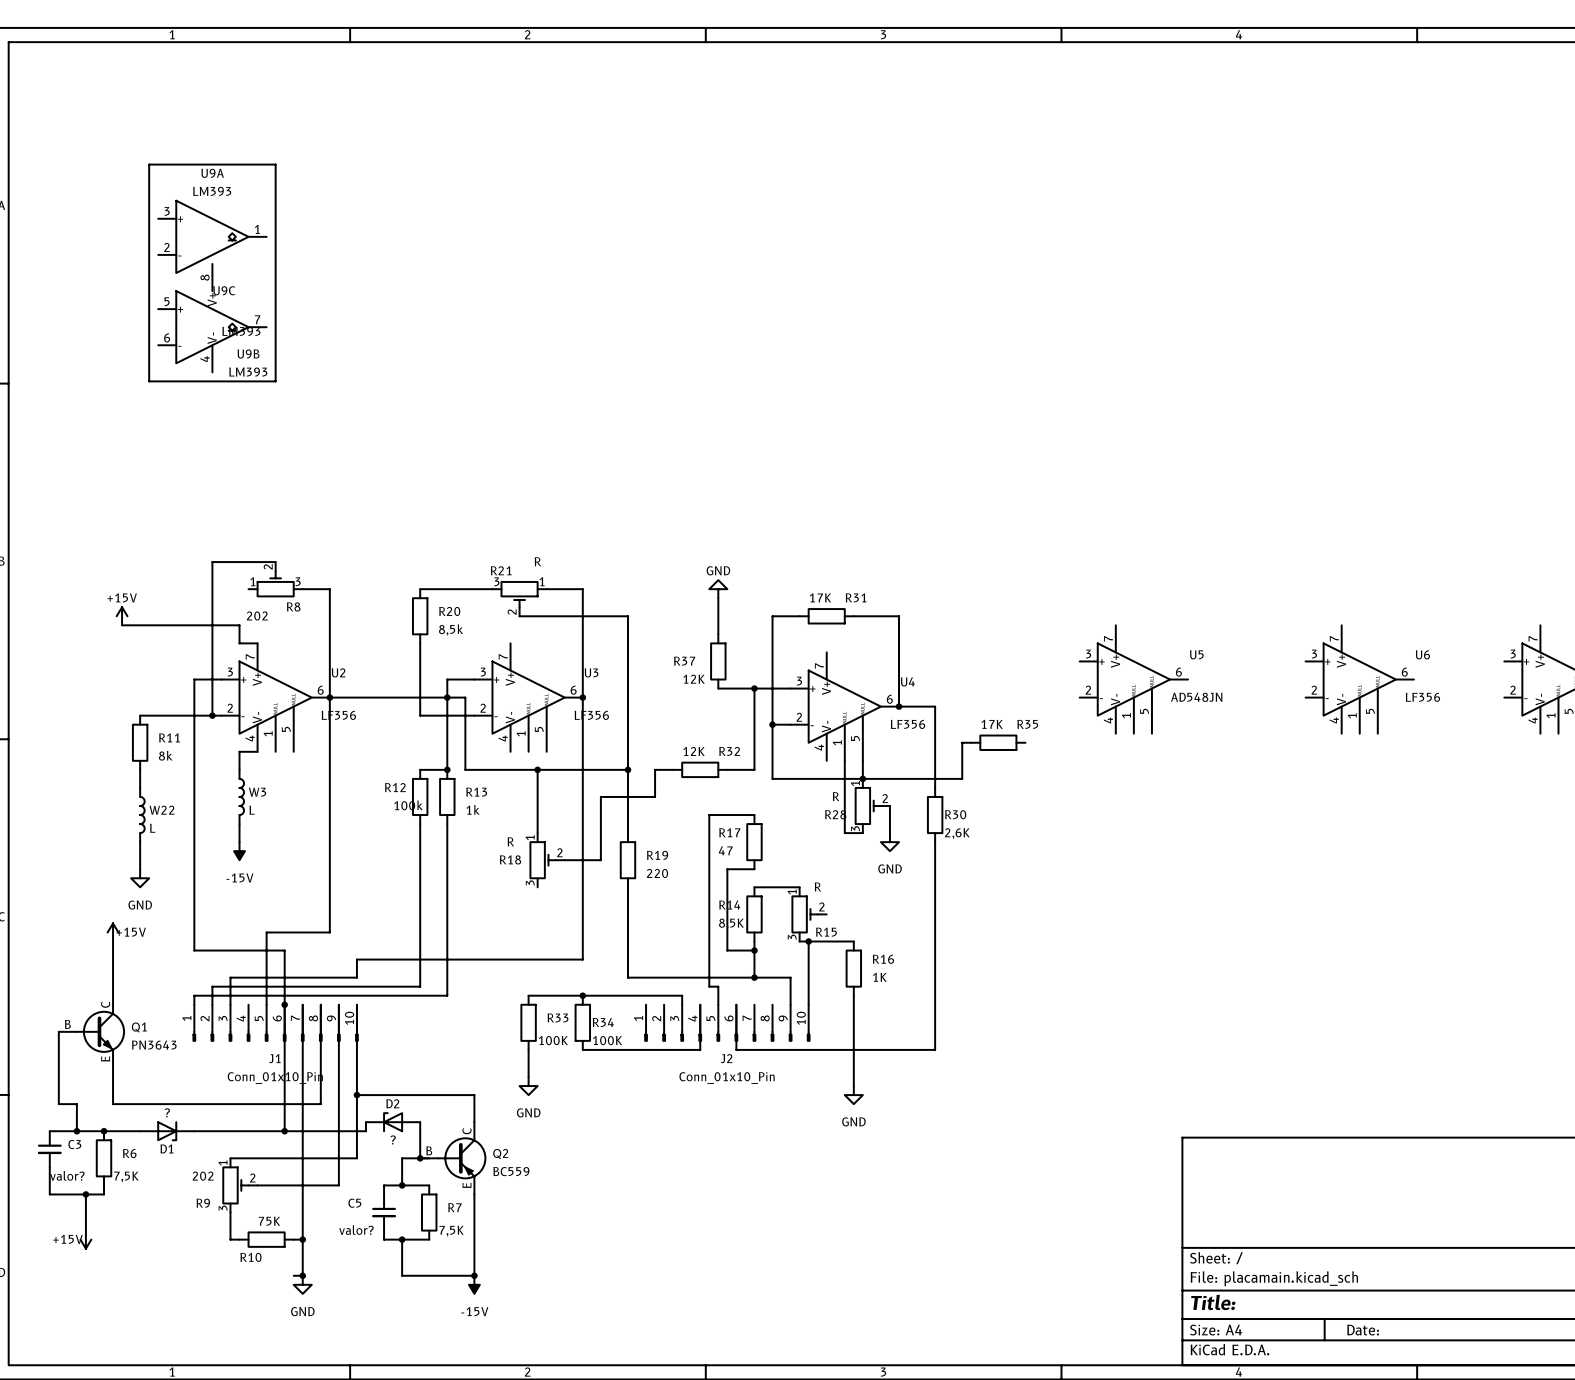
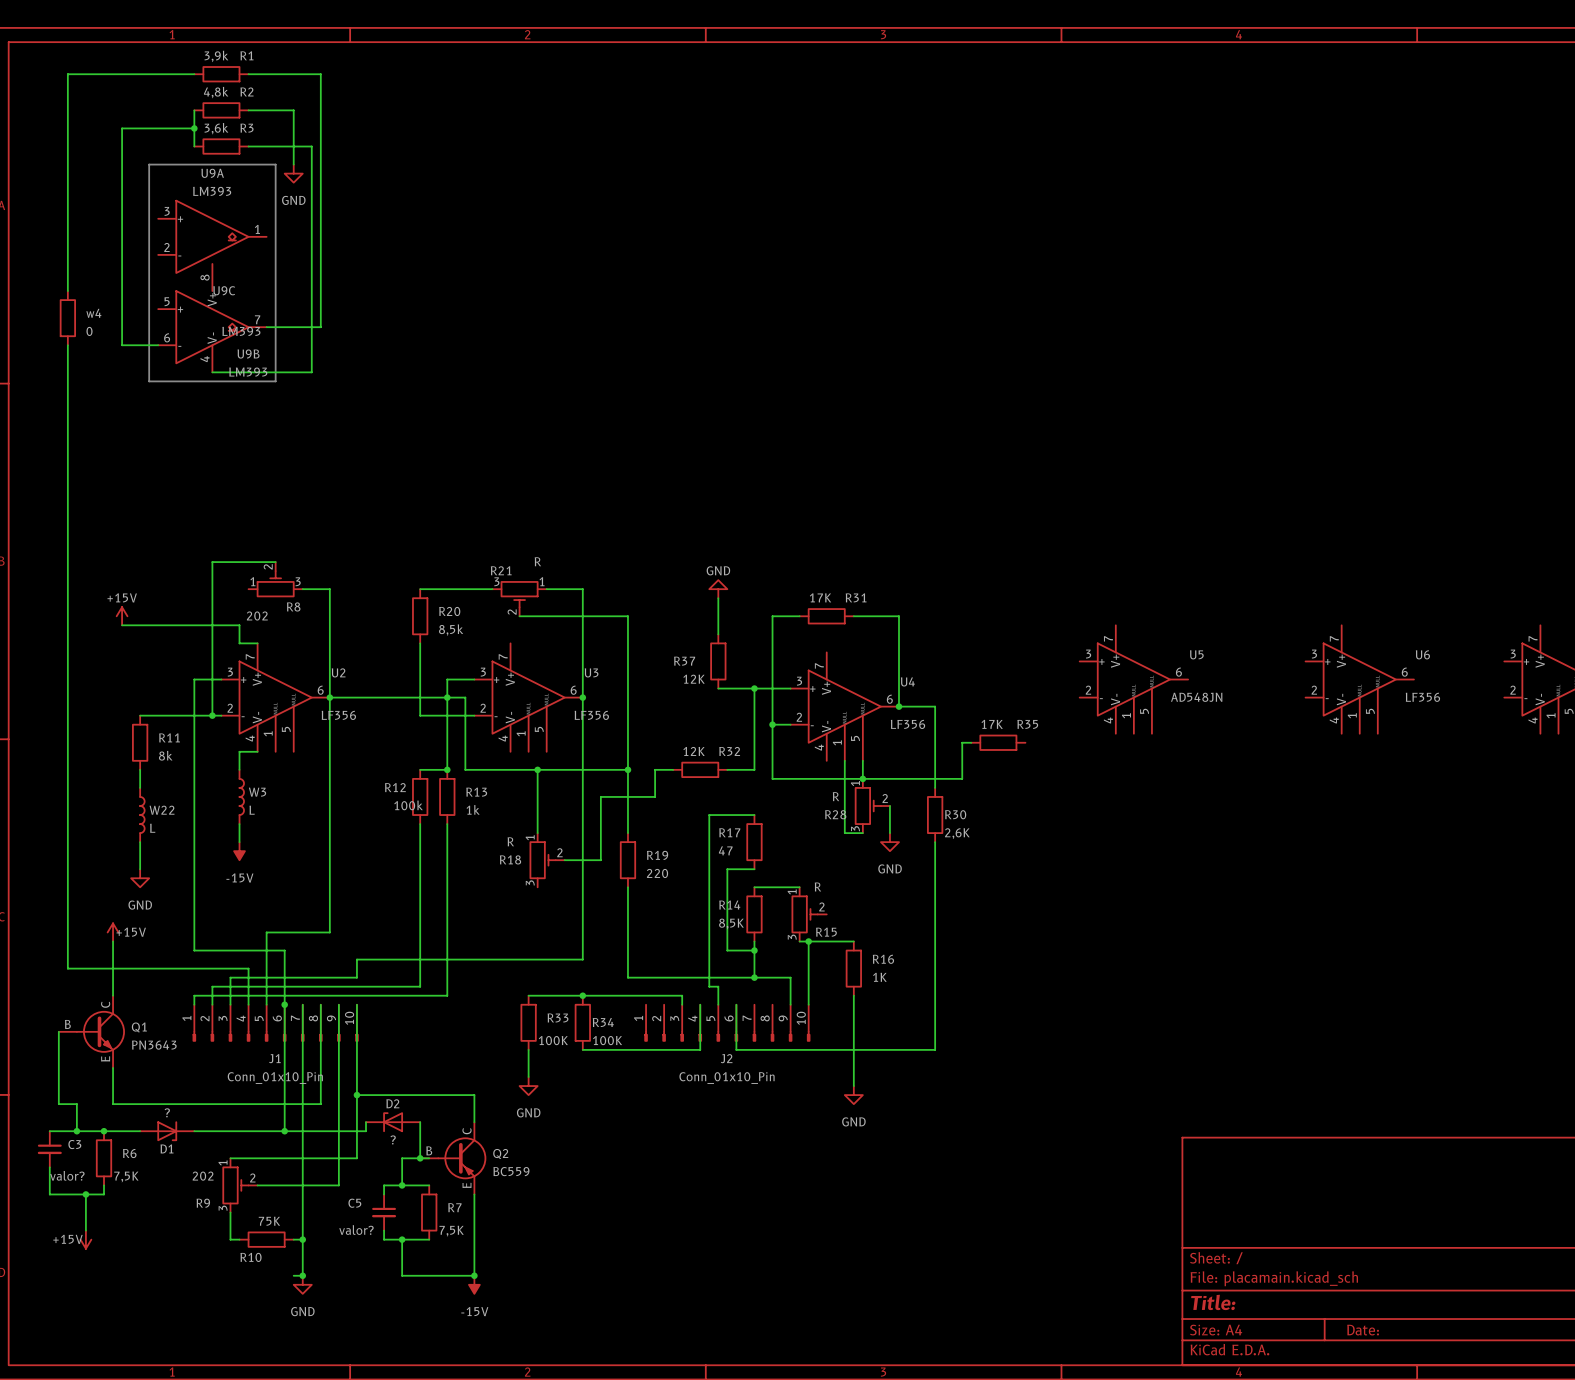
wire: none -> (194, 74) (67, 74) (67, 291)
R1: none -> 3,9k (221, 74)
wire: none -> (248, 74) (320, 74) (320, 327) (266, 327)
wire: none -> (194, 110) (194, 146)
R2: none -> 4,8k (221, 110)
wire: none -> (248, 110) (293, 110) (293, 164)
wire: none -> (194, 128) (122, 128) (122, 345) (158, 345)
junction: none -> (194, 128)
R3: none -> 3,6k (221, 146)
wire: none -> (248, 146) (311, 146) (311, 372) (212, 372)
power symbol: none -> GND (293, 173)
w4: none -> 0 (67, 318)
wire: none -> (67, 345) (67, 968) (248, 968) (248, 1004)

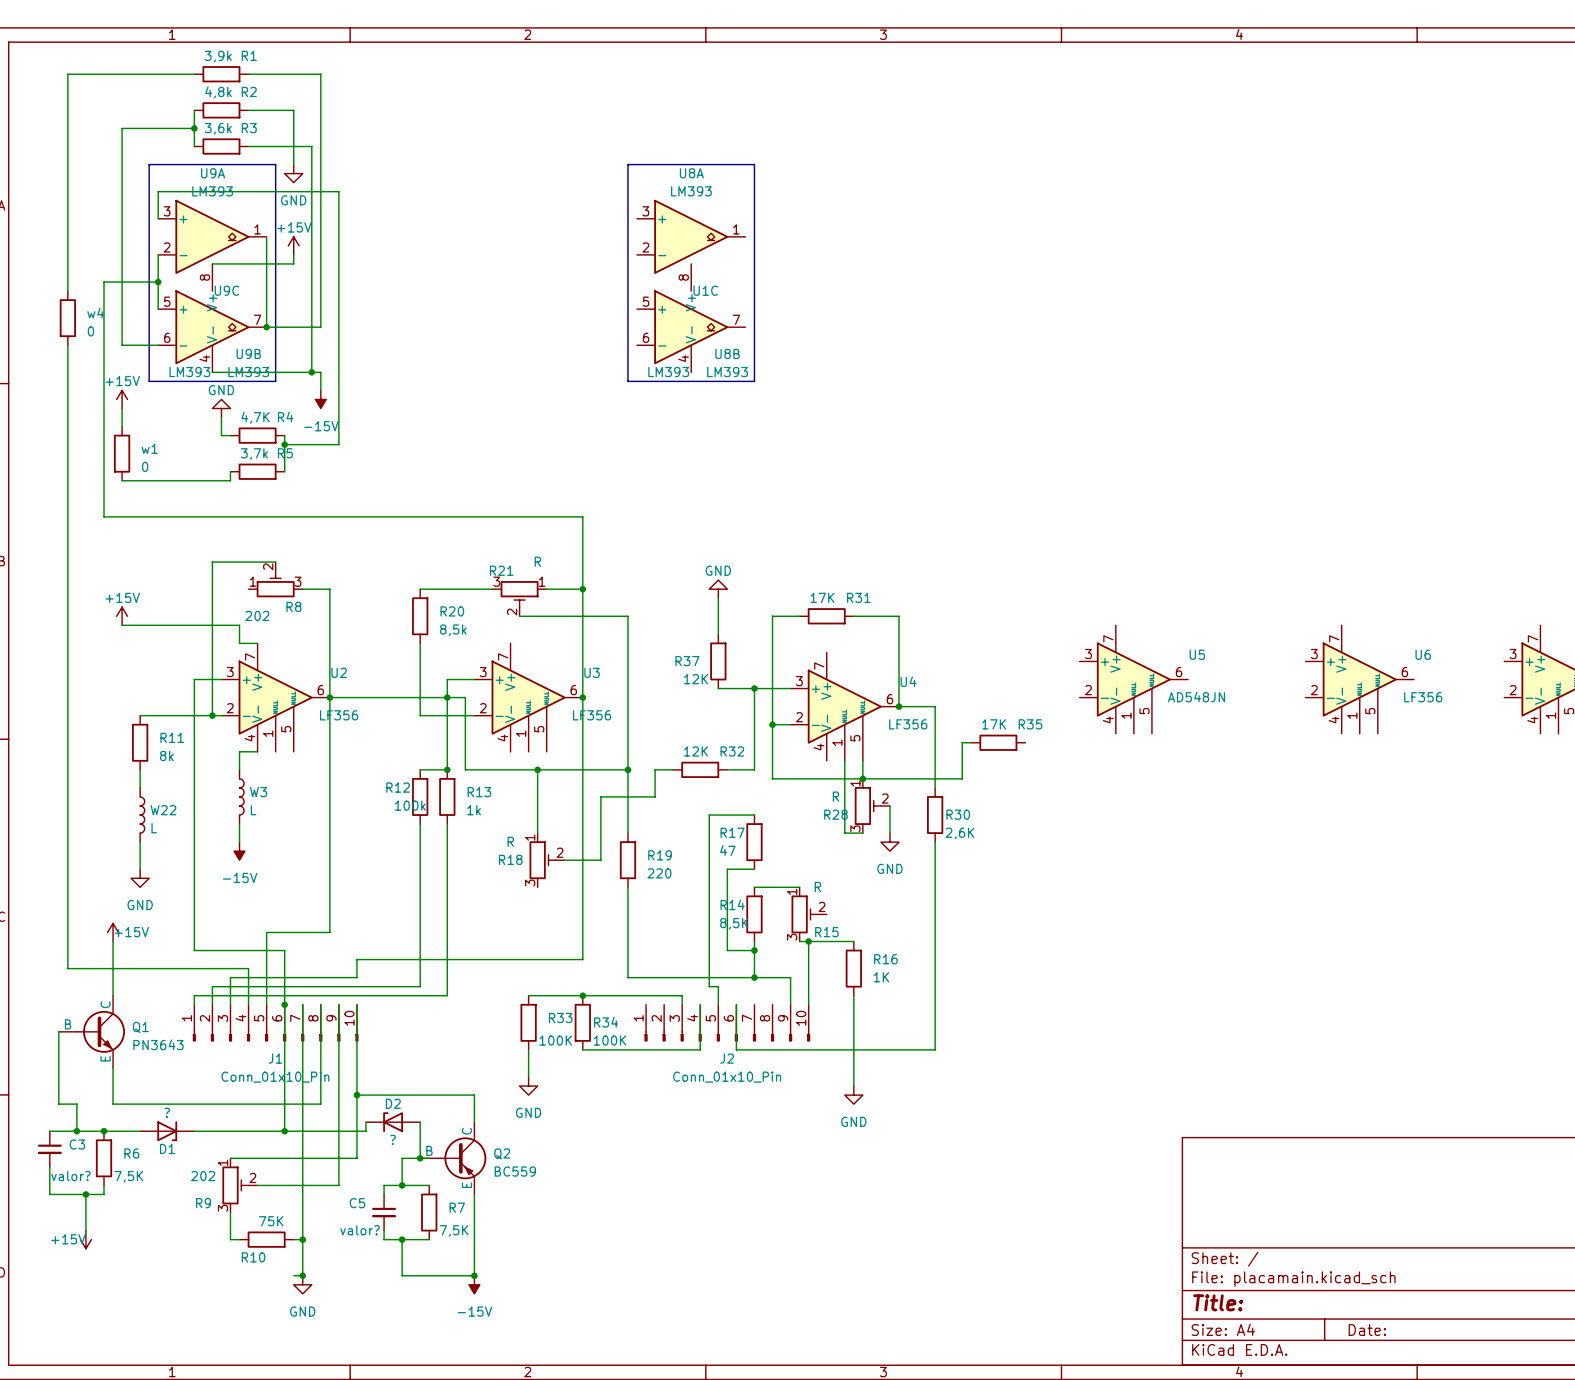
line: none -> (627, 164) (754, 164) (754, 381) (627, 381) (627, 164)
wire: none -> (158, 218) (158, 191) (338, 191) (338, 444) (284, 444)
wire: none -> (266, 236) (266, 327)
U8A: none -> LM393 (691, 236)
power symbol: none -> +15V (293, 245)
wire: none -> (158, 254) (158, 309)
wire: none -> (293, 254) (293, 263) (212, 263)
wire: none -> (158, 282) (104, 282) (104, 516) (582, 516) (582, 589)
junction: none -> (158, 282)
U1C: none -> LM393 (691, 318)
junction: none -> (266, 327)
U8B: none -> LM393 (691, 327)
U9C value position: LM393 (241, 331) -> LM393 (189, 372)
wire: none -> (311, 372) (320, 372) (320, 390)
junction: none -> (311, 372)
power symbol: none -> +15V (122, 399)
power symbol: none -> -15V (320, 399)
wire: none -> (122, 408) (122, 426)
power symbol: none -> GND (221, 408)
wire: none -> (221, 417) (221, 435) (230, 435)
R4: none -> 4,7K (257, 435)
wire: none -> (284, 435) (284, 471)
junction: none -> (284, 444)
w1: none -> 0 (122, 453)
wire: none -> (230, 471) (230, 480) (122, 480)
R5: none -> 3,7k (257, 471)
junction: none -> (582, 589)

